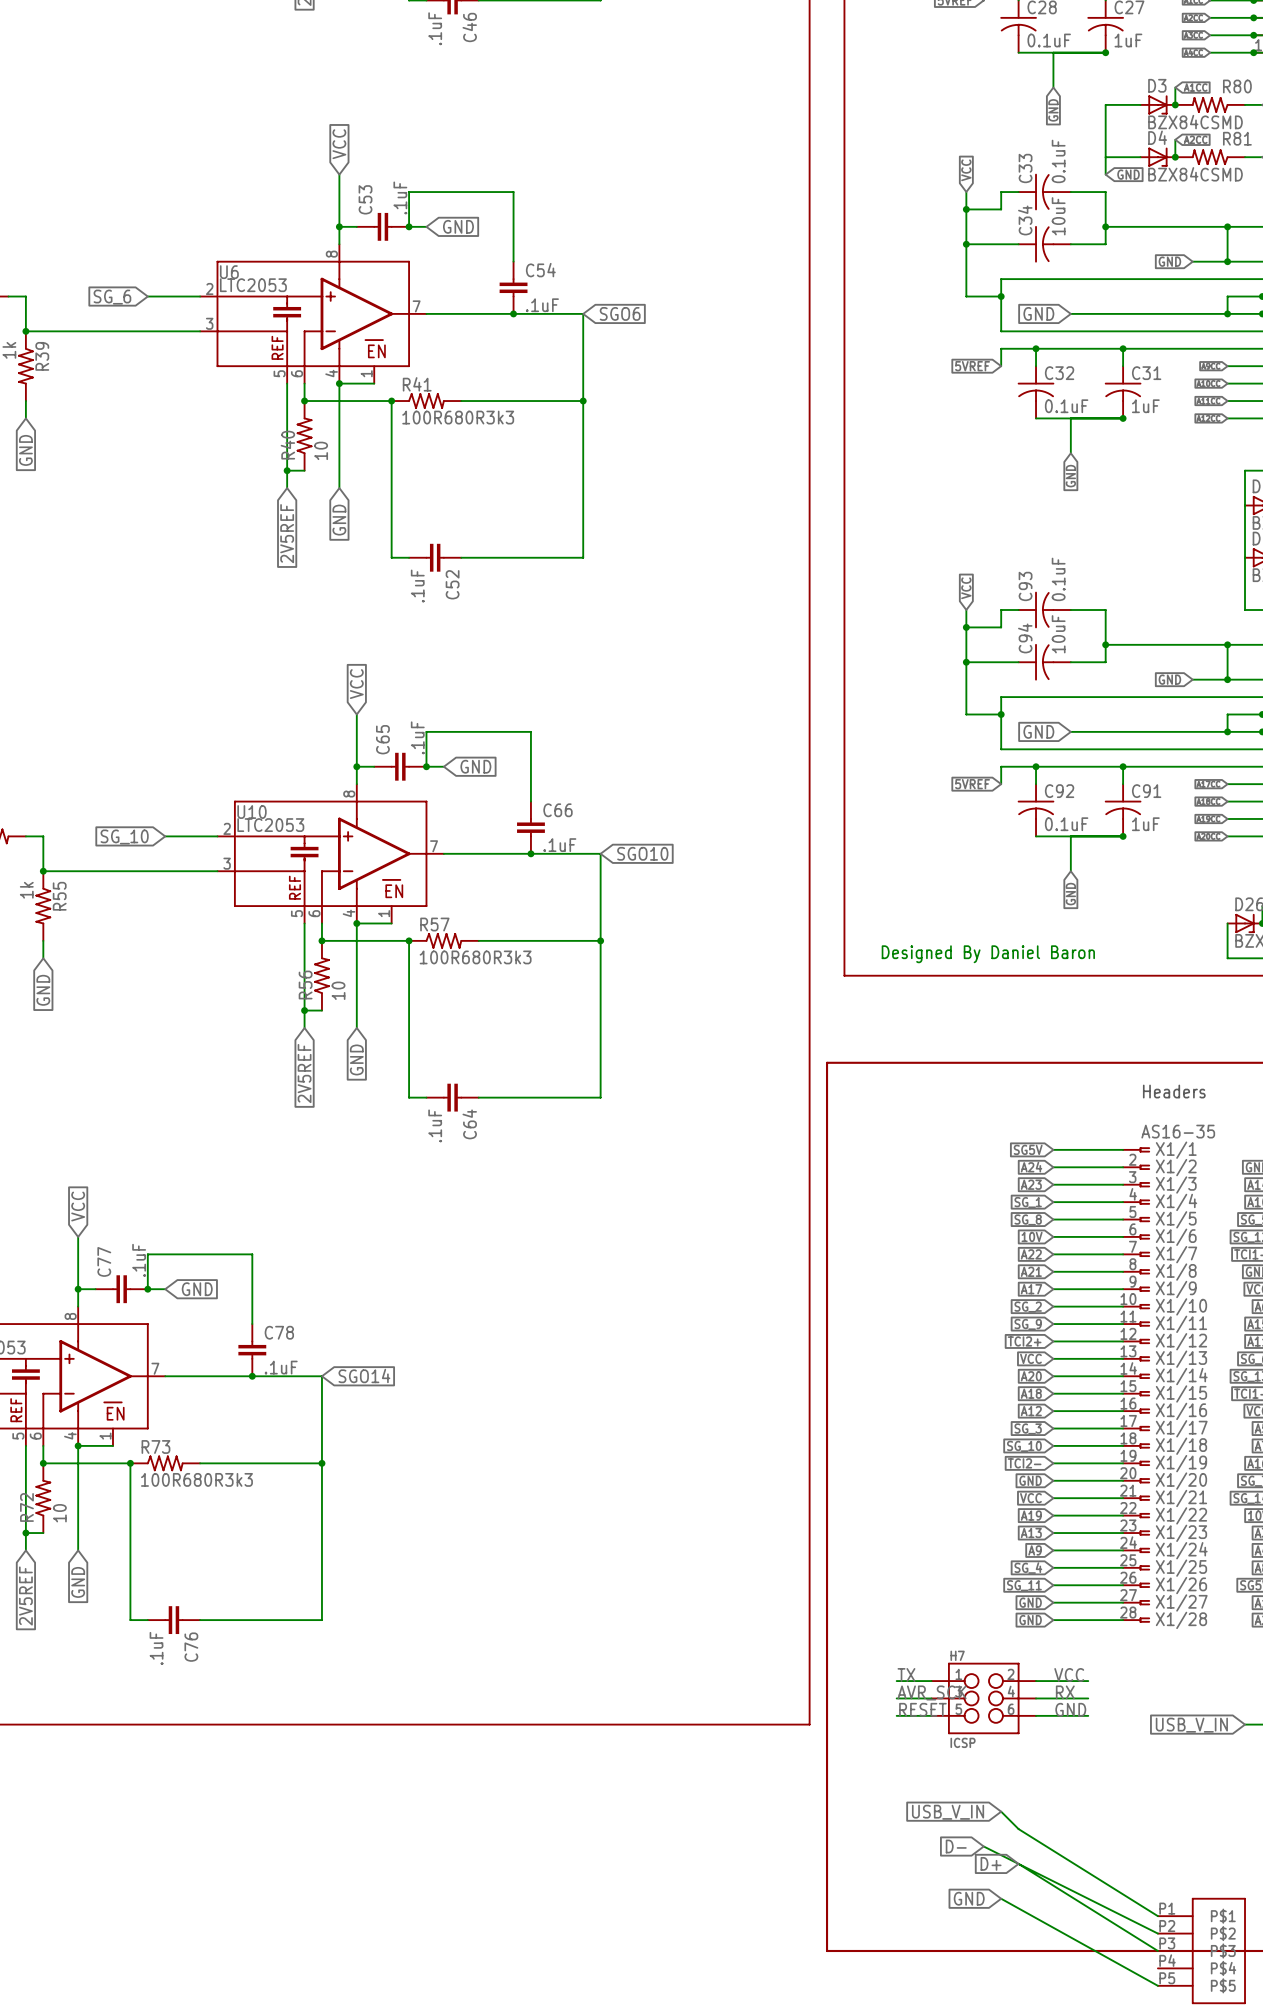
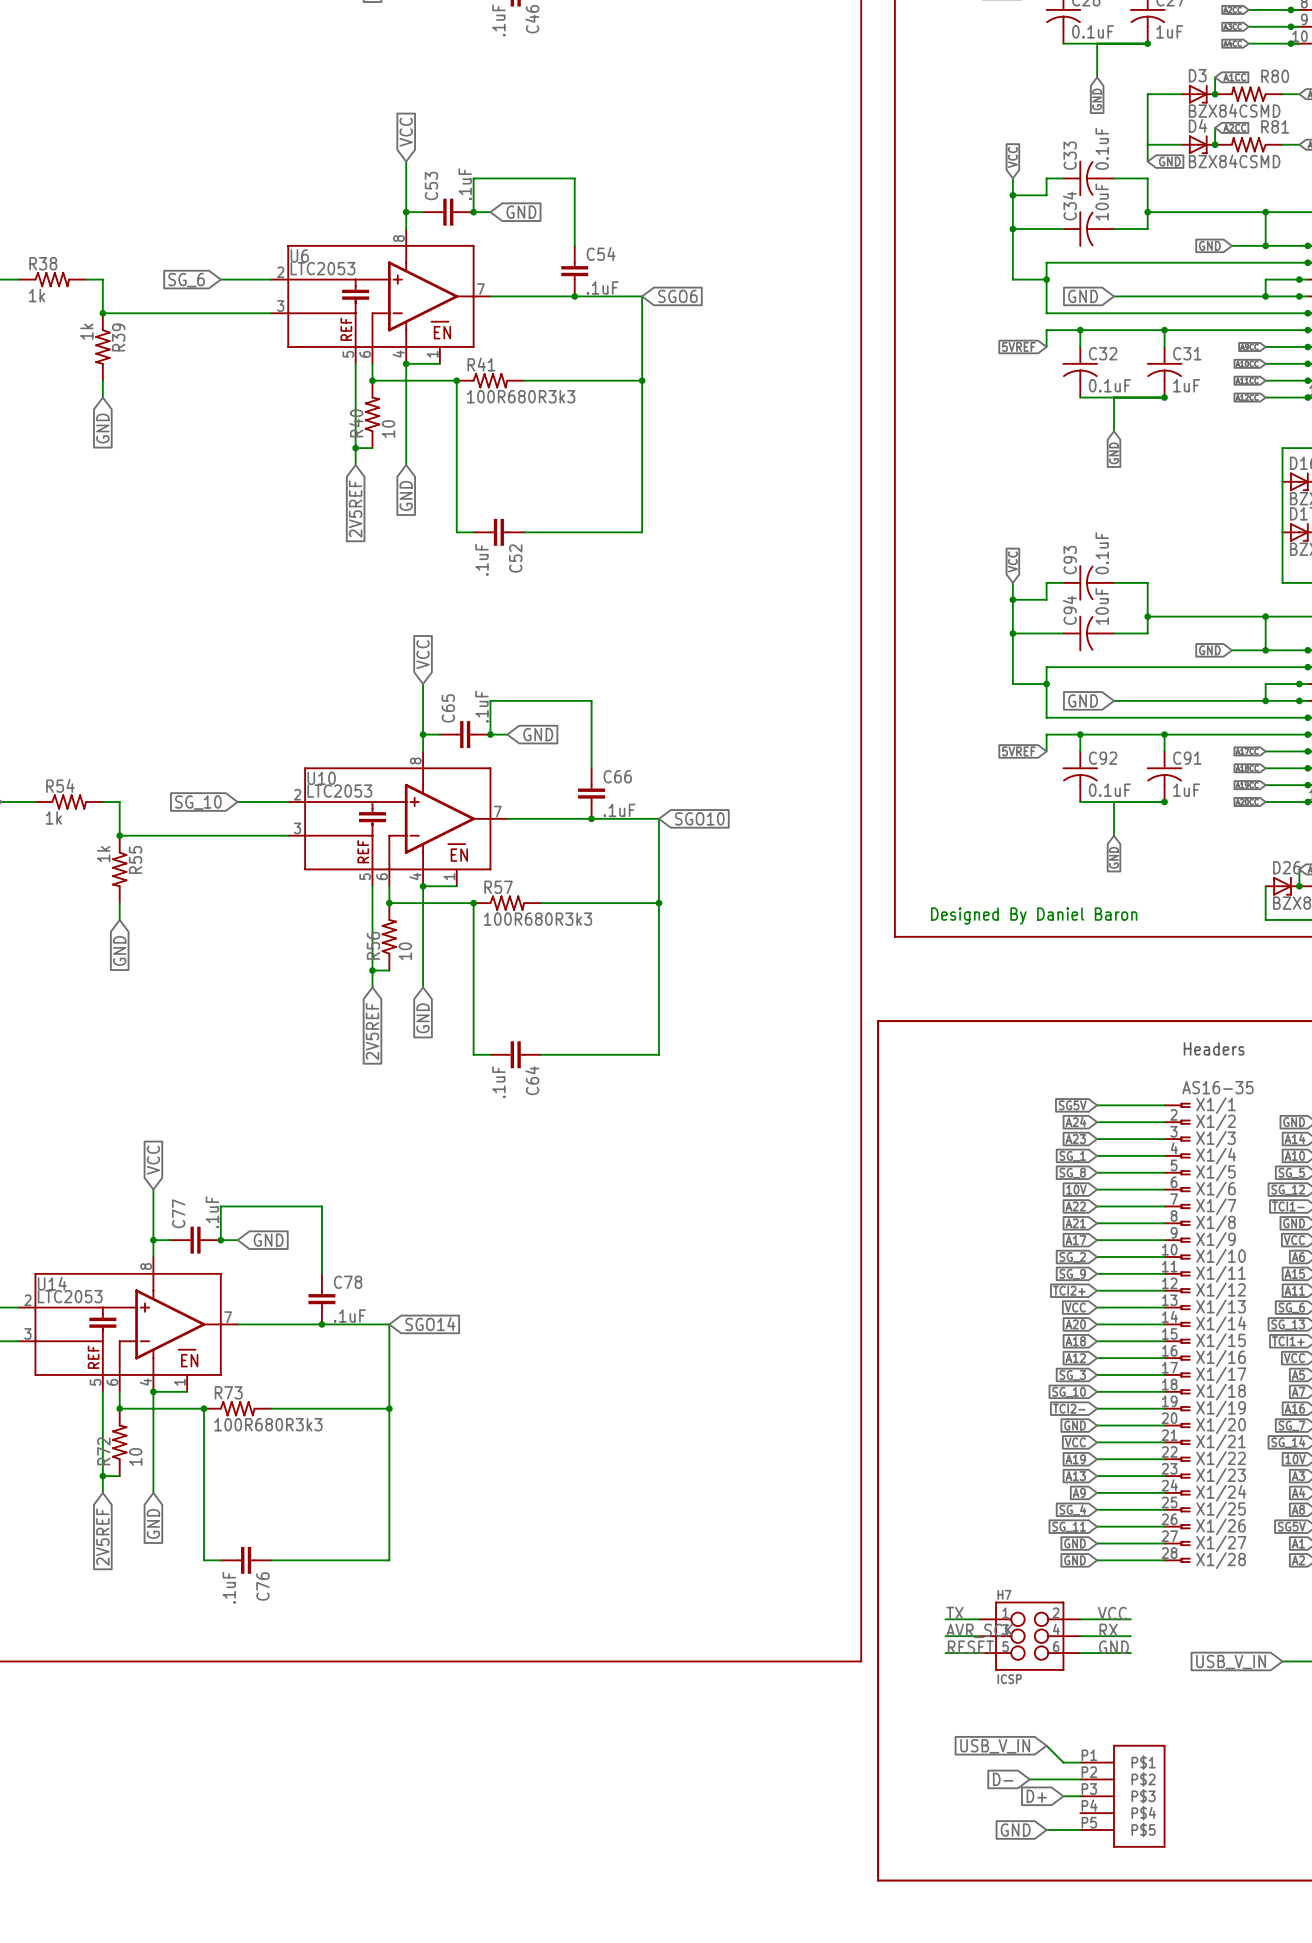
wire: (1018, 1829) (1157, 1916) -> (1063, 1762) (1080, 1762)
wire: (983, 1846) (1157, 1933) -> (1029, 1779) (1080, 1779)
wire: (1018, 1863) (1157, 1950) -> (1063, 1796) (1080, 1796)
wire: (1001, 1898) (1157, 1985) -> (1046, 1830) (1080, 1830)
part position: (1201, 1950) -> (1122, 1796)

